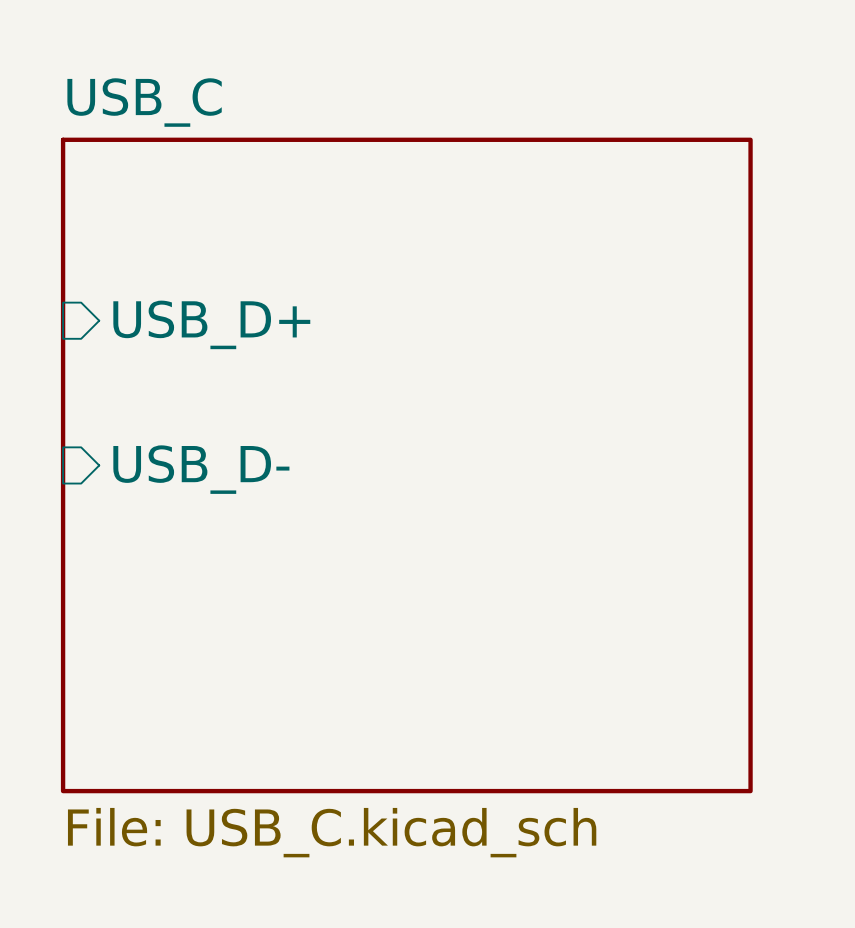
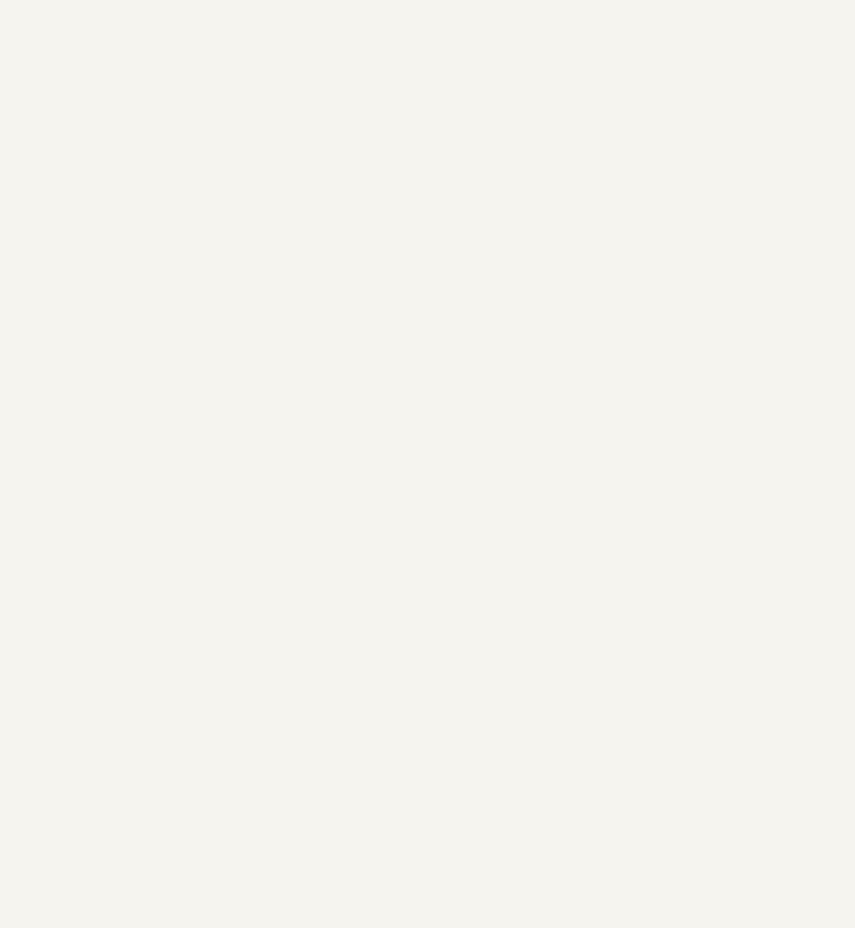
sheet pin: USB_D+ (211, 324) -> none
sheet USB_C: File: USB_C.kicad_sch (406, 465) -> none
sheet pin: USB_D- (201, 469) -> none

